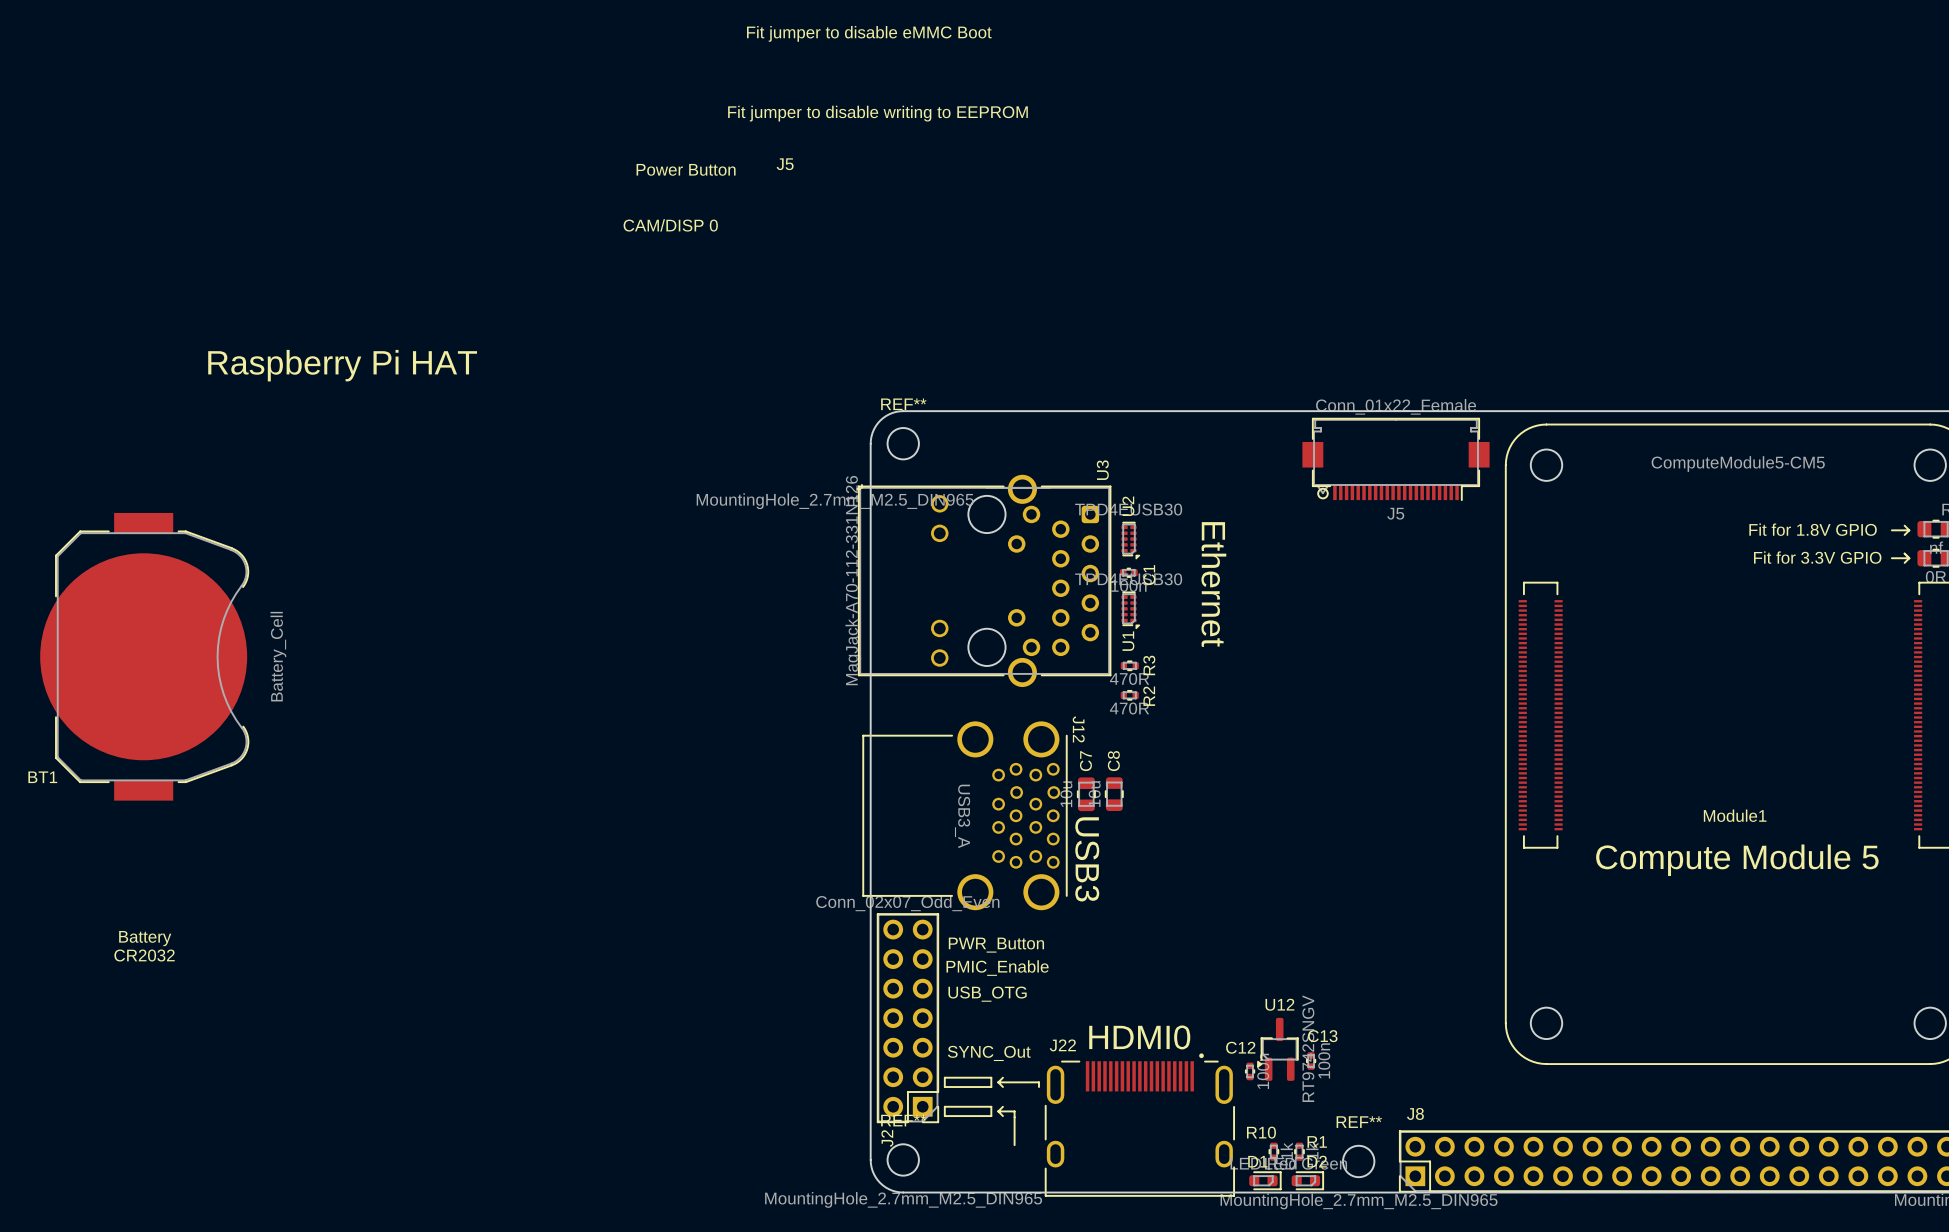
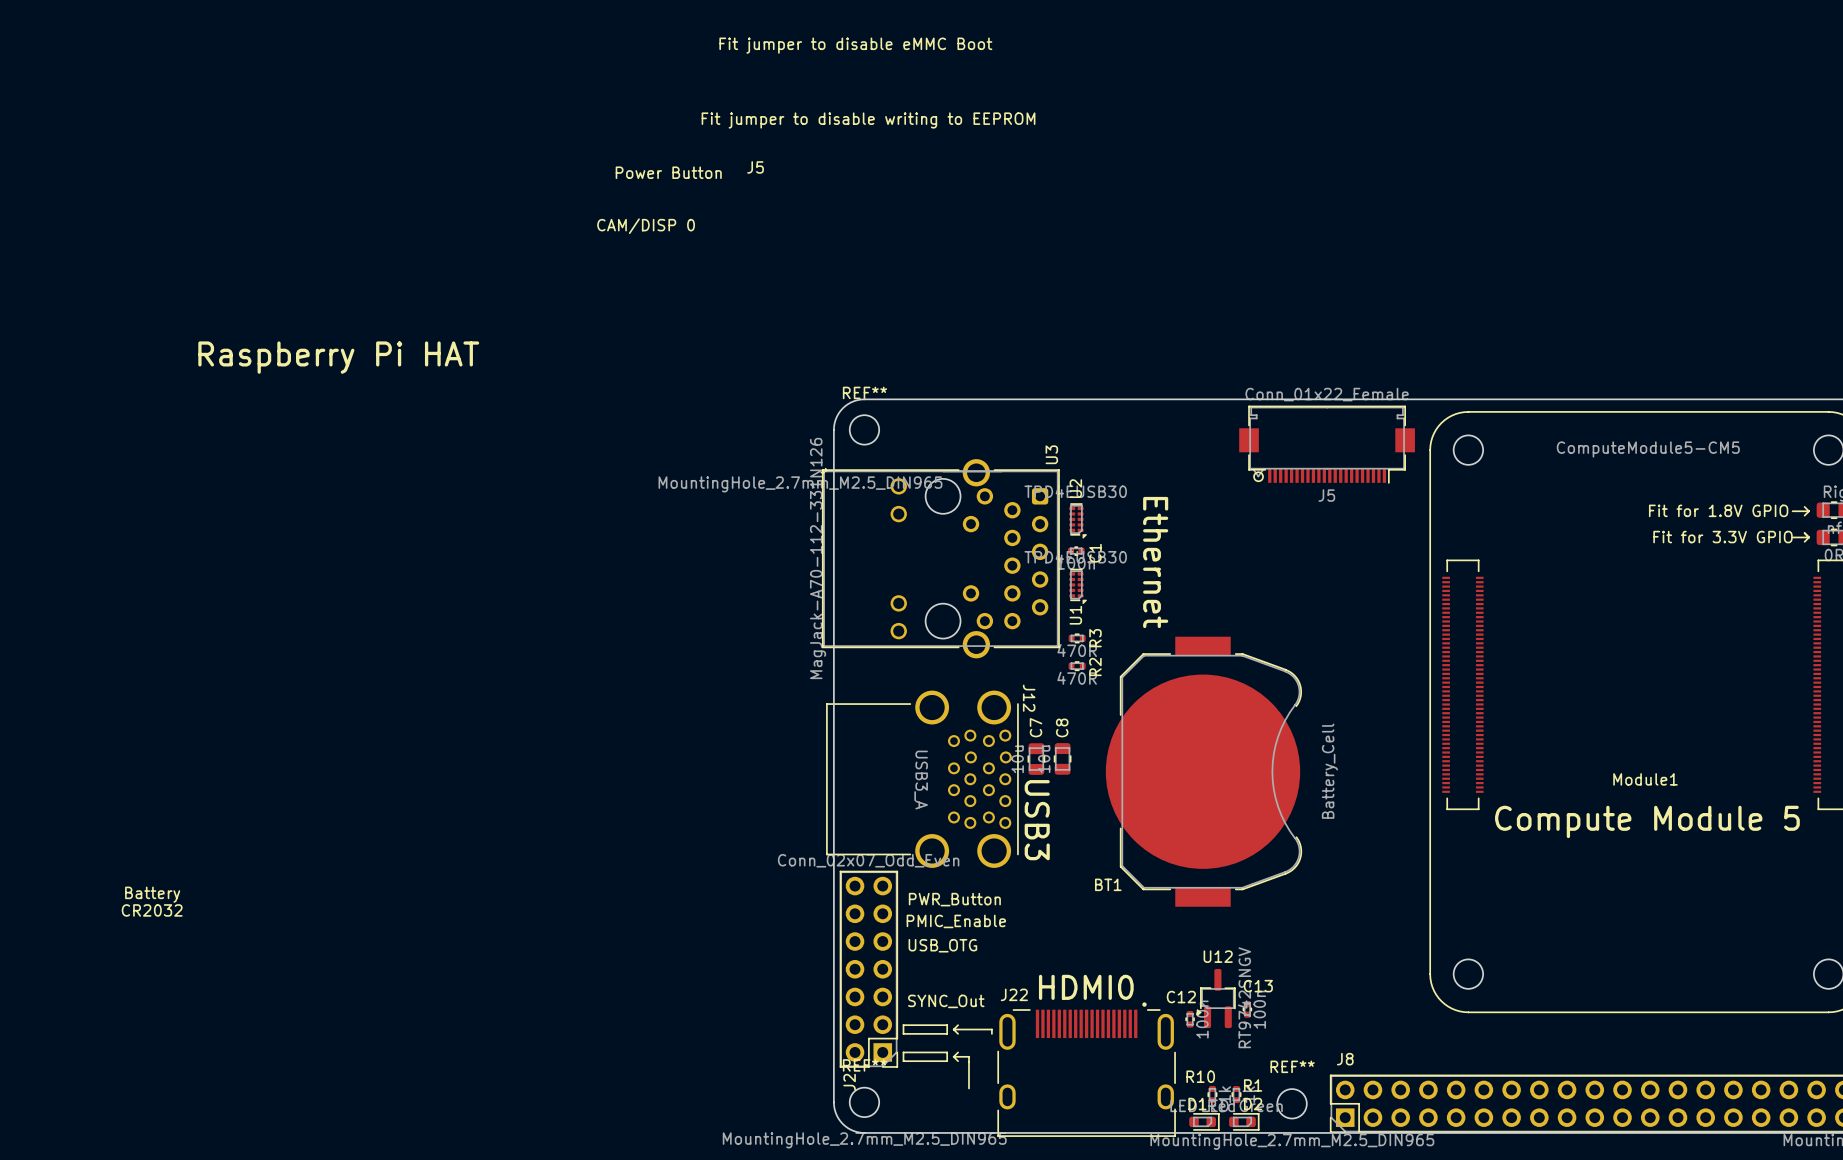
BT1 position: (144, 656) -> (1203, 771)

